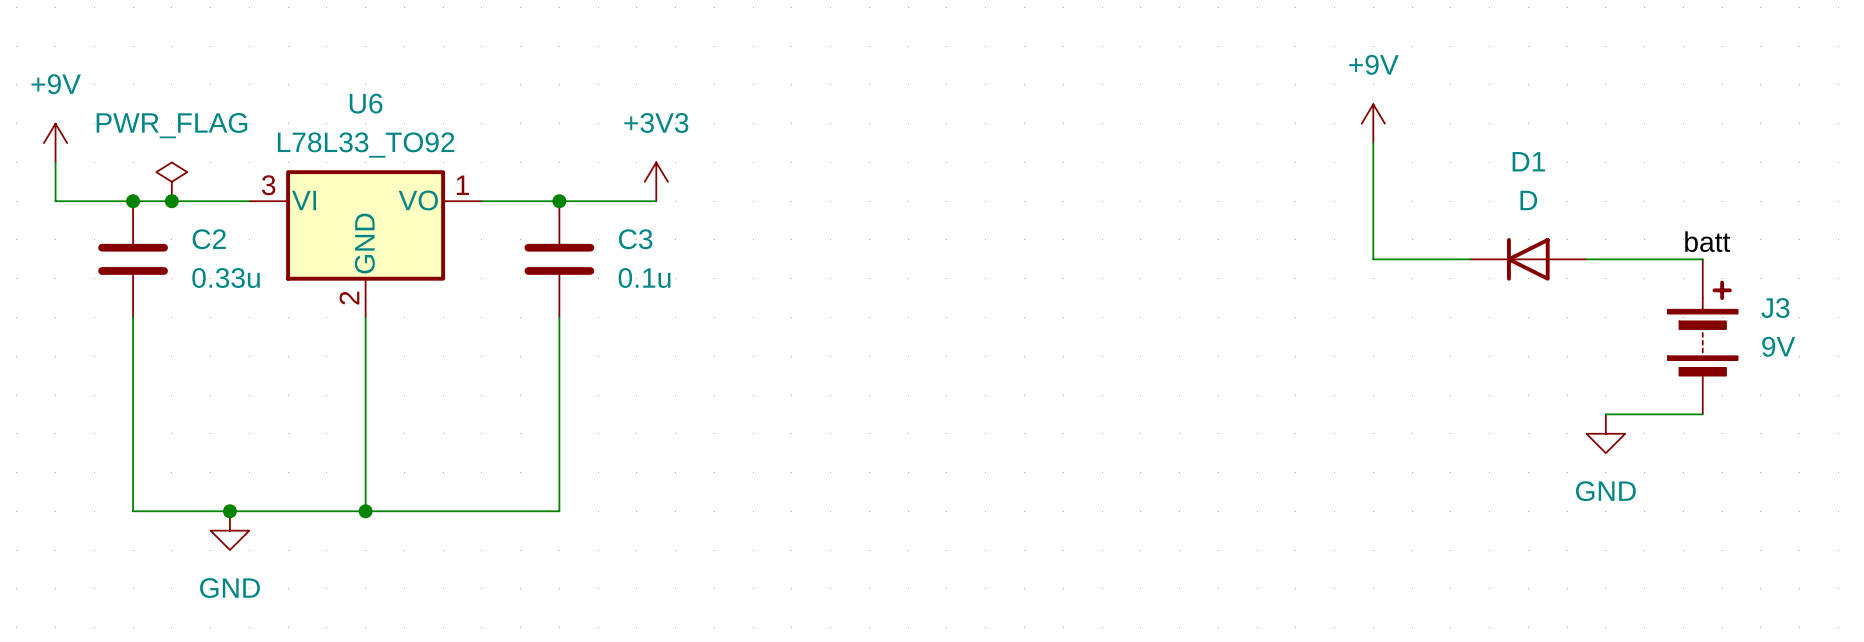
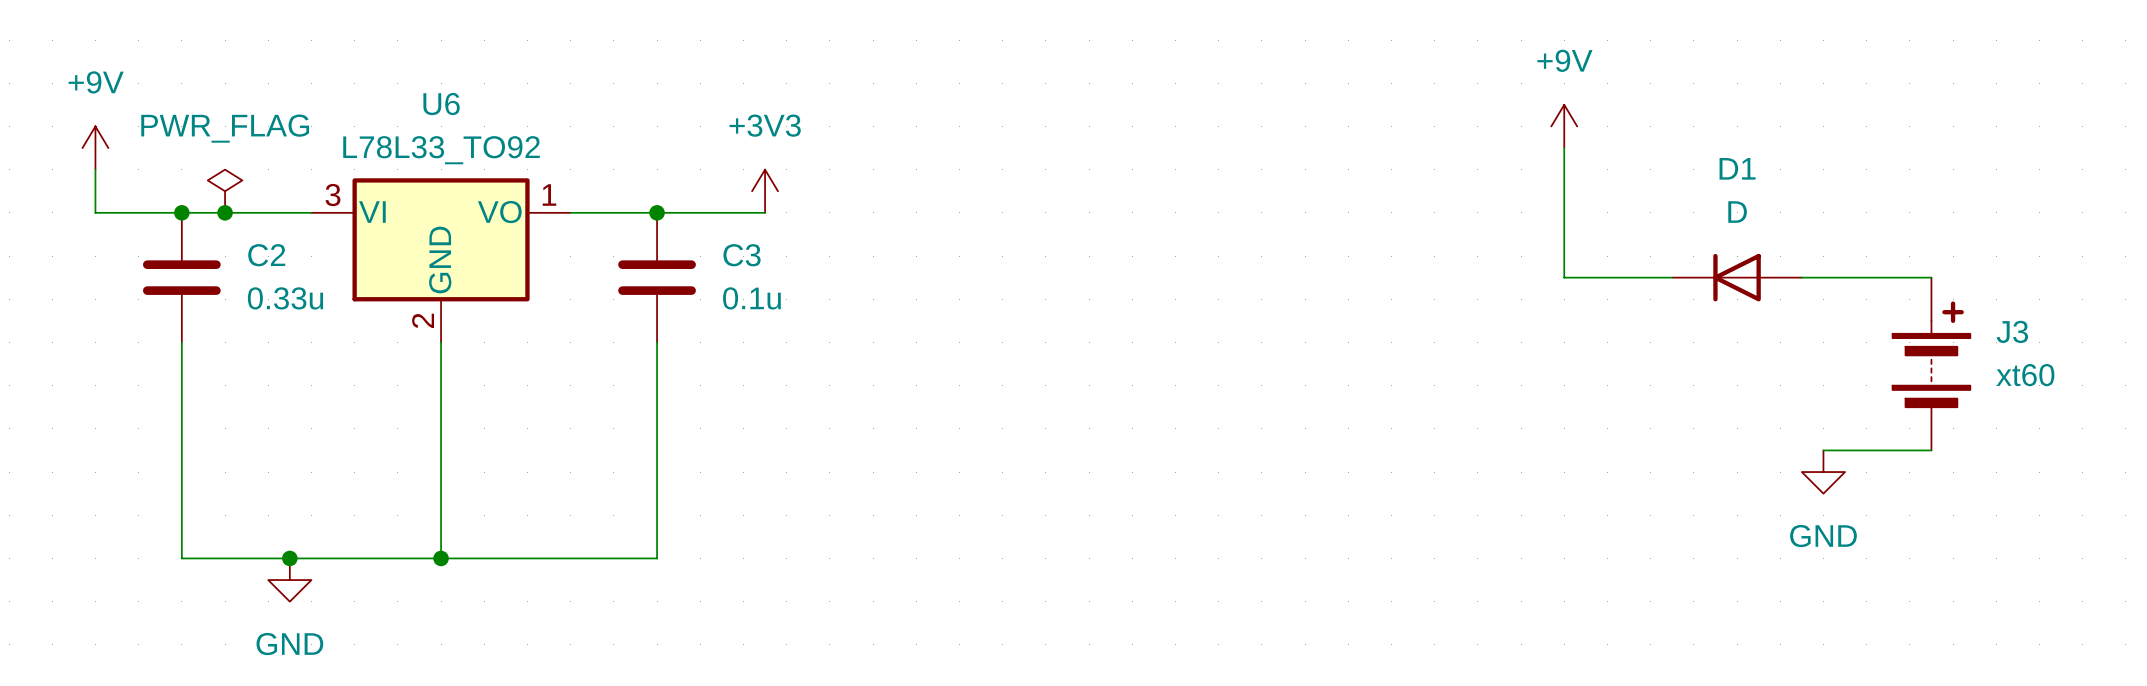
label: batt (1707, 241) -> none
J3 value: 9V (1778, 346) -> xt60 (2025, 375)

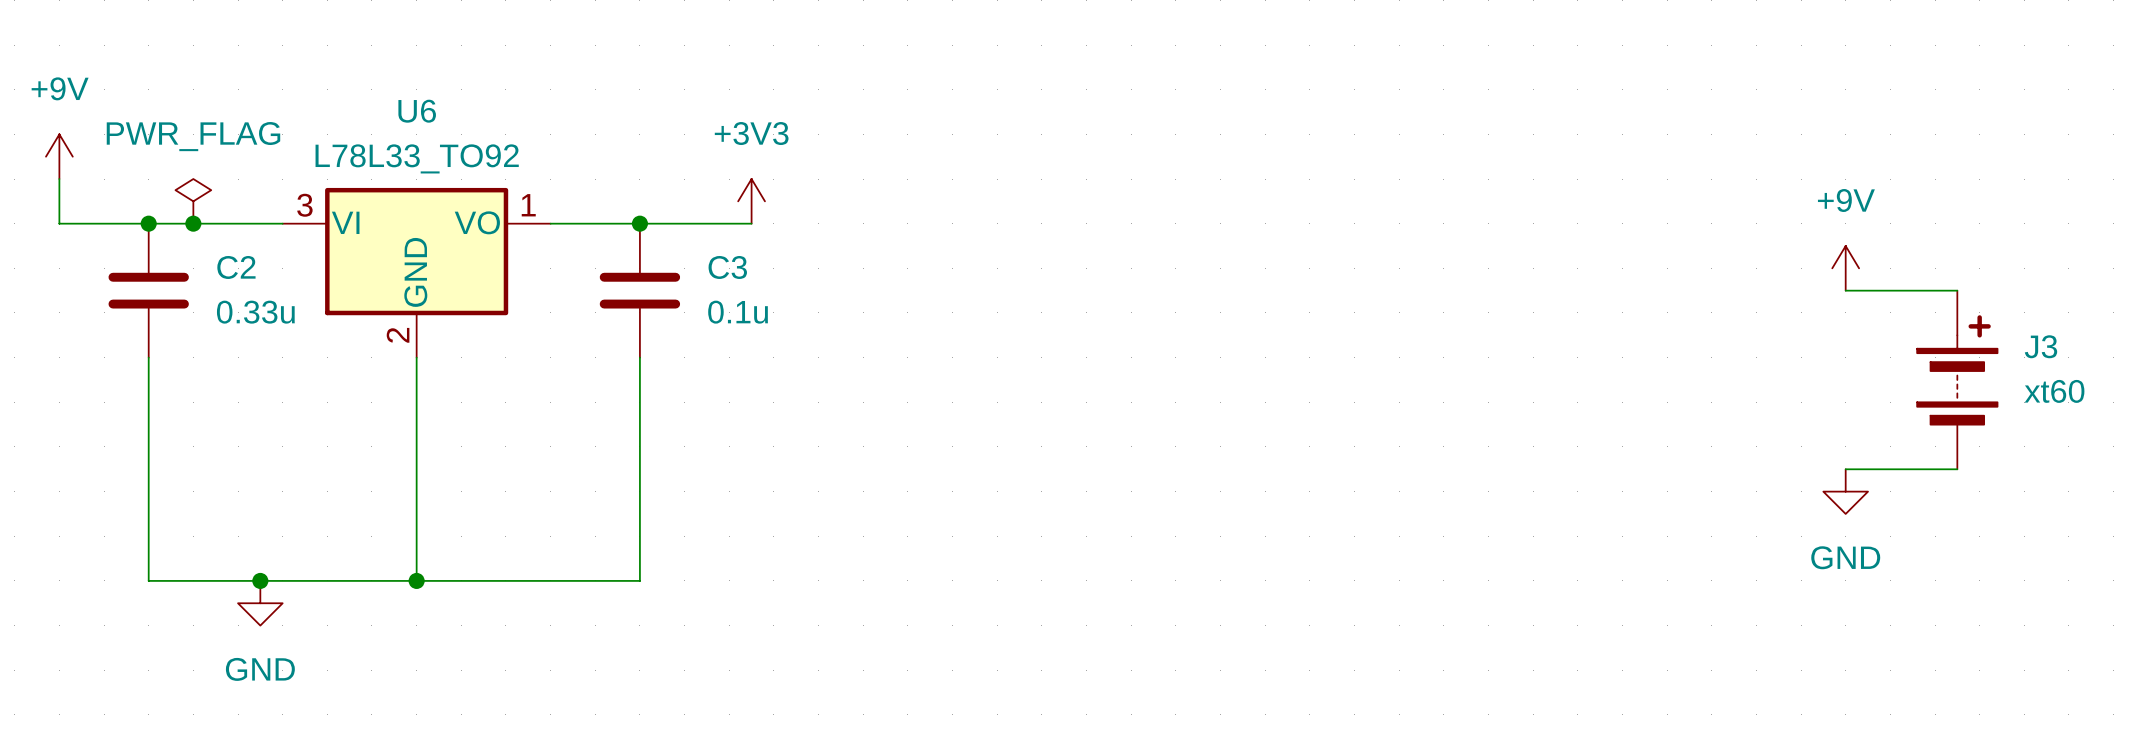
power symbol position: +9V (1564, 126) -> +9V (1845, 268)
wire: (1564, 148) (1564, 277) (1672, 277) -> none
D1: D (1737, 277) -> none
wire: (1801, 277) (1823, 277) -> none

